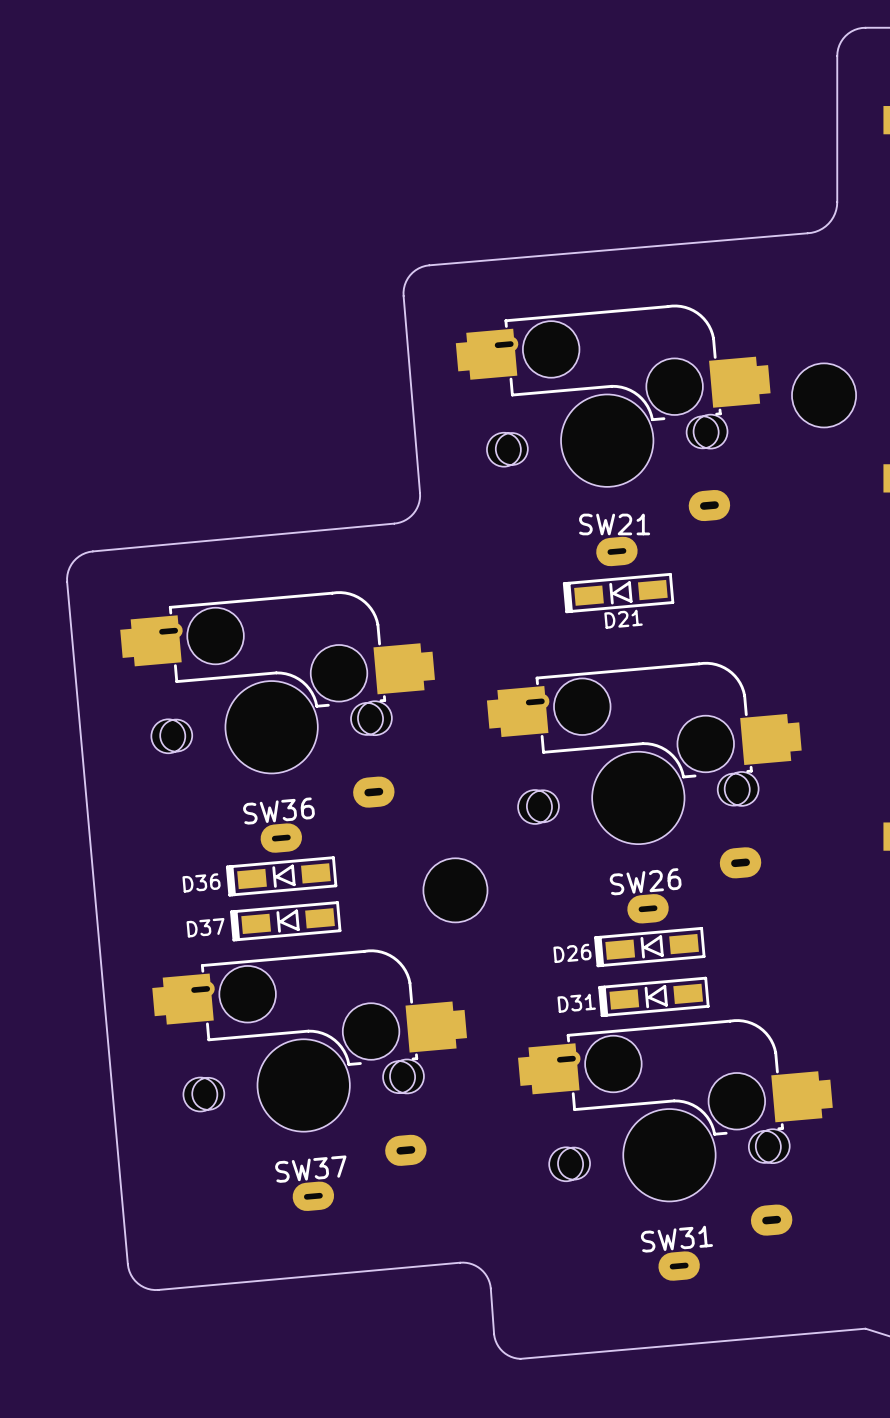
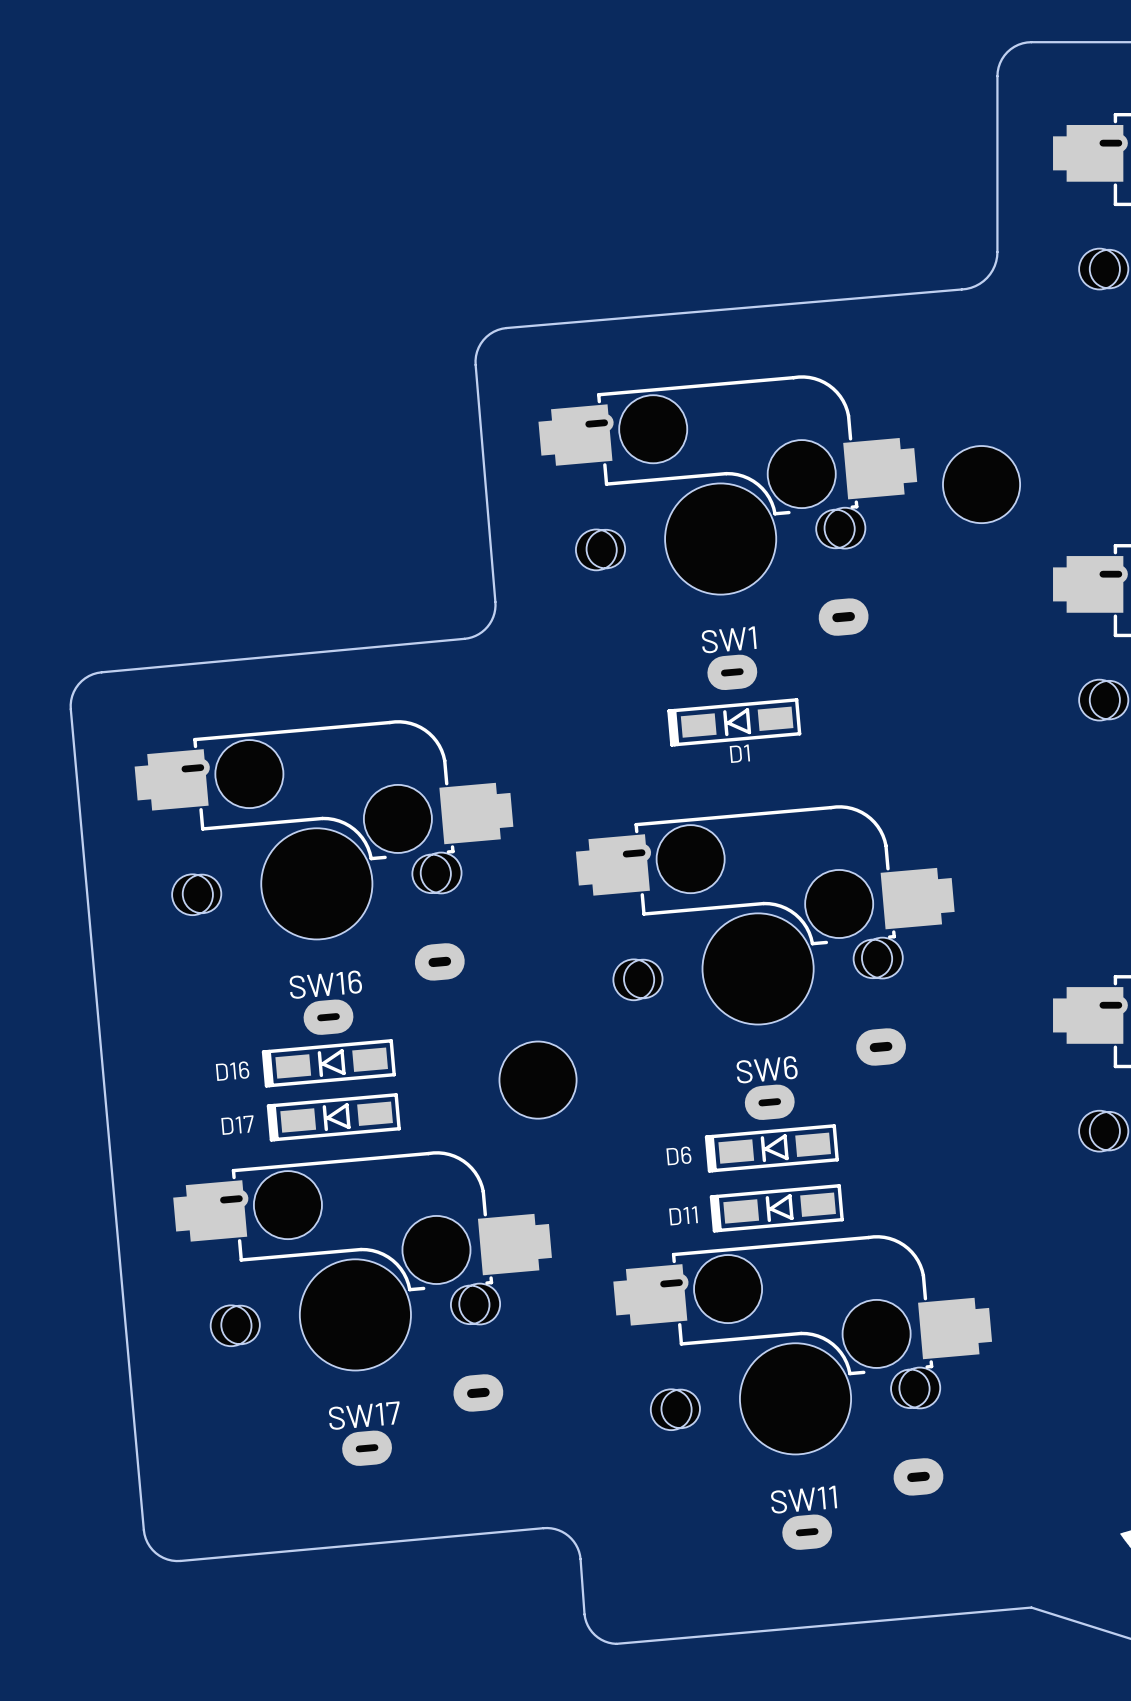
SW21 name: SW21 (614, 524) -> SW1 (729, 639)
D21 name: D21 (623, 619) -> D1 (739, 753)
SW36 name: SW36 (278, 811) -> SW16 (325, 984)
SW26 name: SW26 (645, 881) -> SW6 (767, 1069)
D36 name: D36 (201, 882) -> D16 (232, 1071)
D37 name: D37 (205, 927) -> D17 (237, 1125)
D26 name: D26 (572, 953) -> D6 (678, 1155)
D31 name: D31 (576, 1003) -> D11 (683, 1215)
SW37 name: SW37 (310, 1169) -> SW17 (364, 1415)
SW31 name: SW31 (676, 1239) -> SW11 (804, 1499)

